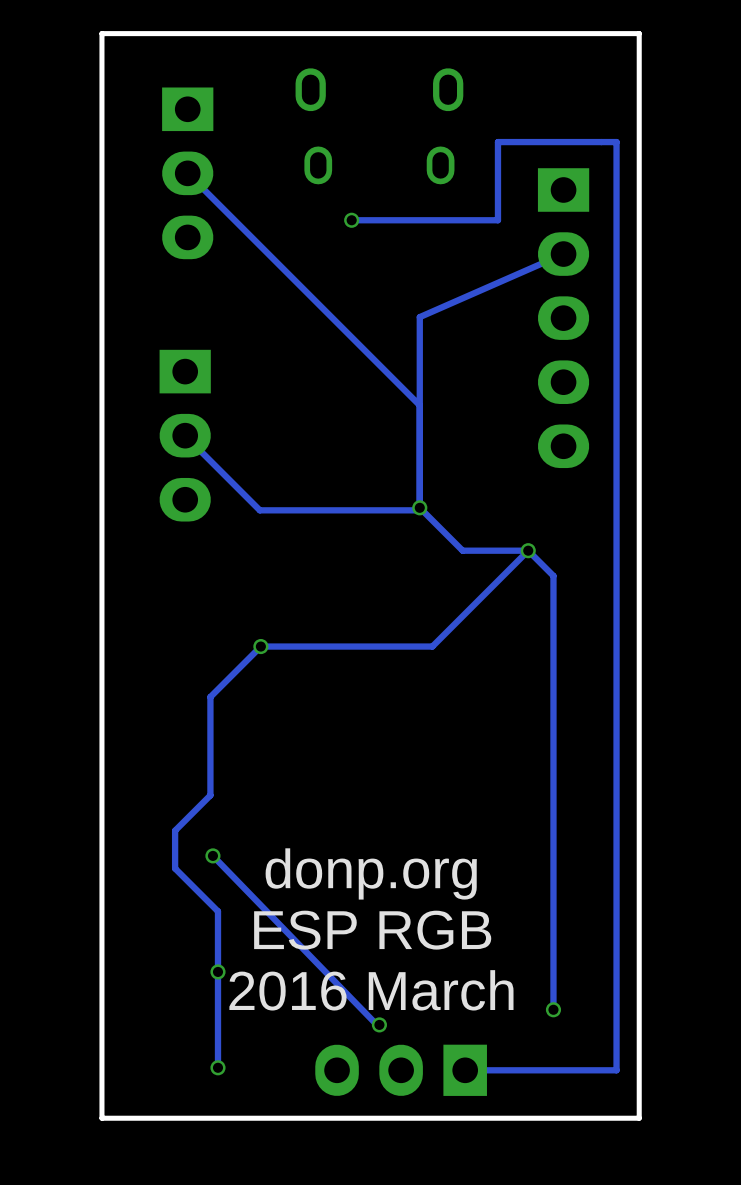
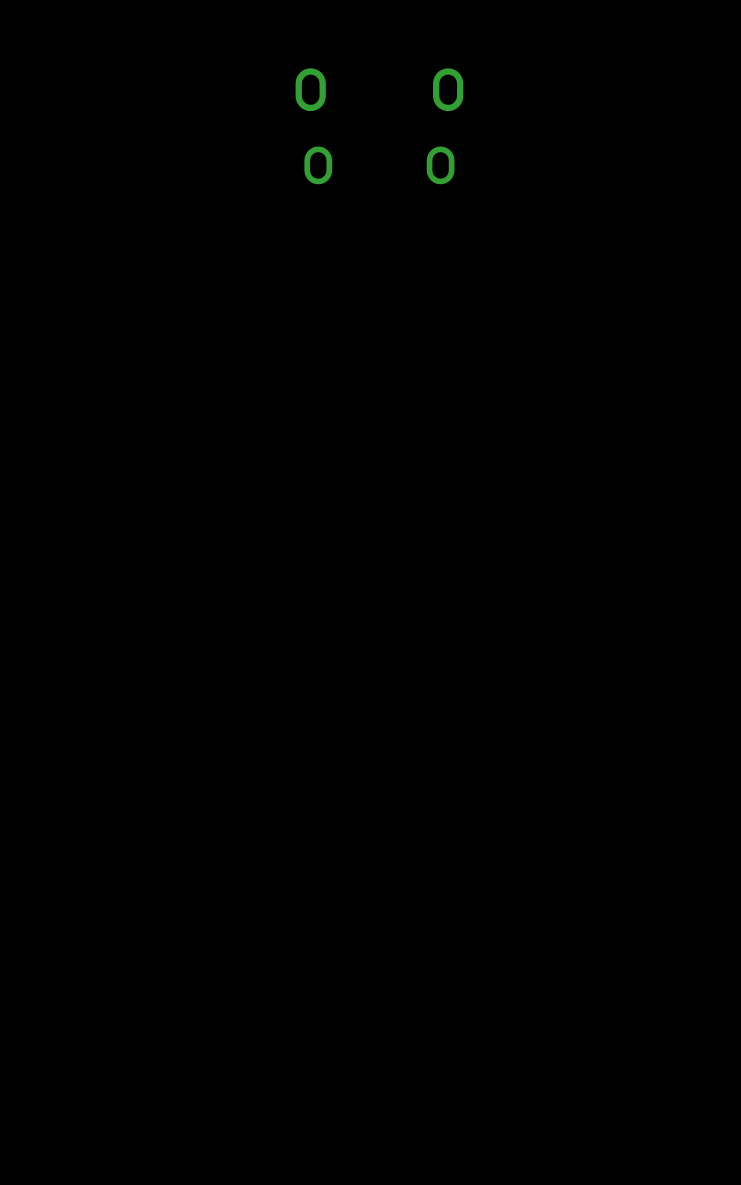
board edge: (639, 33) (639, 1118) (101, 1118) (101, 33) (639, 33) -> none
track: (187, 173) (419, 405) -> none
part: (187, 173) -> none
track: (351, 220) (497, 220) (497, 142) (616, 142) (616, 1070) (465, 1070) -> none
via: (351, 220) -> none
track: (563, 254) (419, 317) (419, 510) (259, 510) (185, 435) -> none
part: (563, 318) -> none
part: (185, 435) -> none
track: (419, 507) (462, 550) (528, 550) -> none
via: (419, 507) -> none
track: (528, 550) (432, 646) (260, 646) (210, 696) (210, 795) (175, 830) (175, 868) (217, 911) (217, 1067) -> none
track: (528, 550) (553, 575) (553, 1009) -> none
via: (528, 550) -> none
via: (260, 646) -> none
track: (212, 855) (376, 1024) (379, 1024) -> none
via: (212, 855) -> none
text: donp.org (371, 873) -> none
text: ESP RGB (372, 930) -> none
via: (217, 971) -> none
text: 2016 March (371, 990) -> none
via: (553, 1009) -> none
via: (379, 1024) -> none
via: (217, 1067) -> none
part: (401, 1070) -> none

